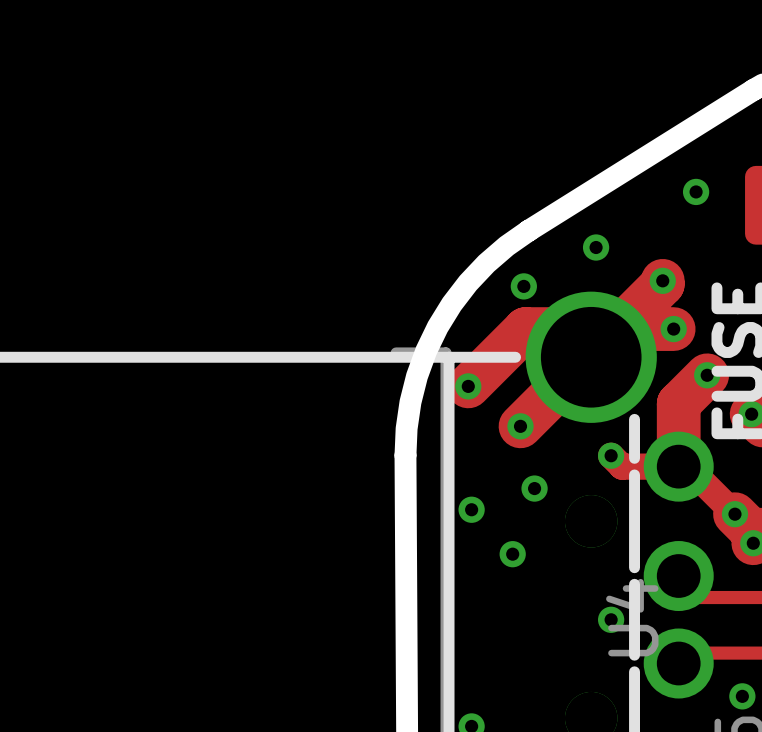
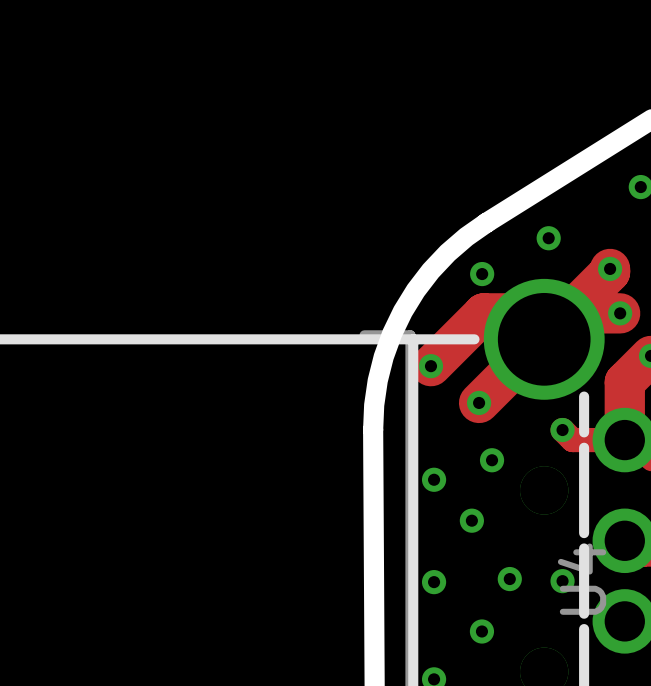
via: none -> (509, 579)
via: none -> (434, 582)
via: none -> (481, 631)

